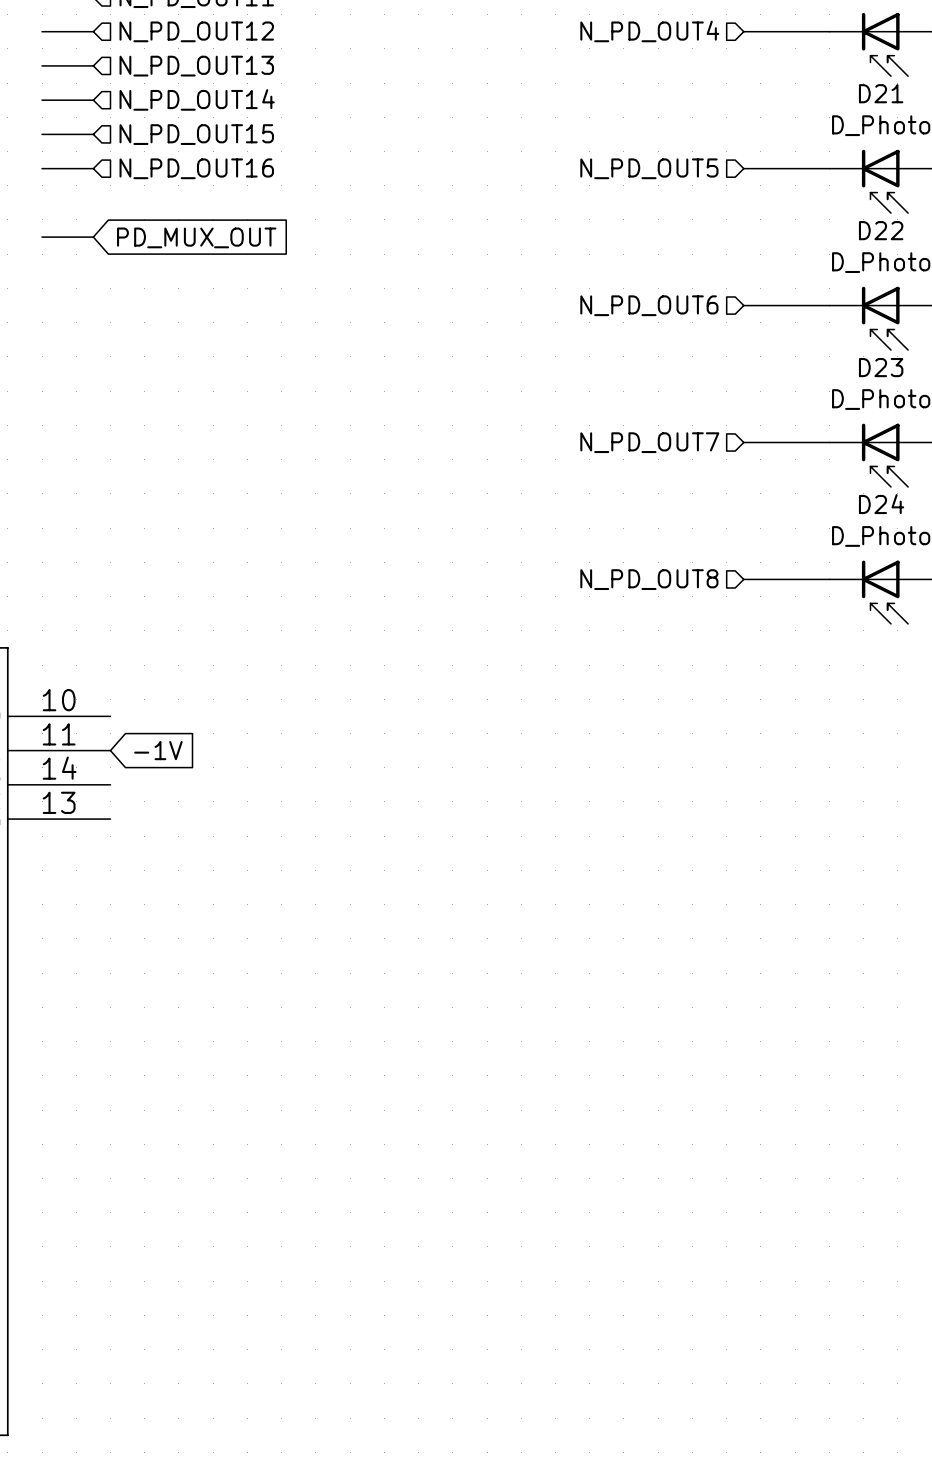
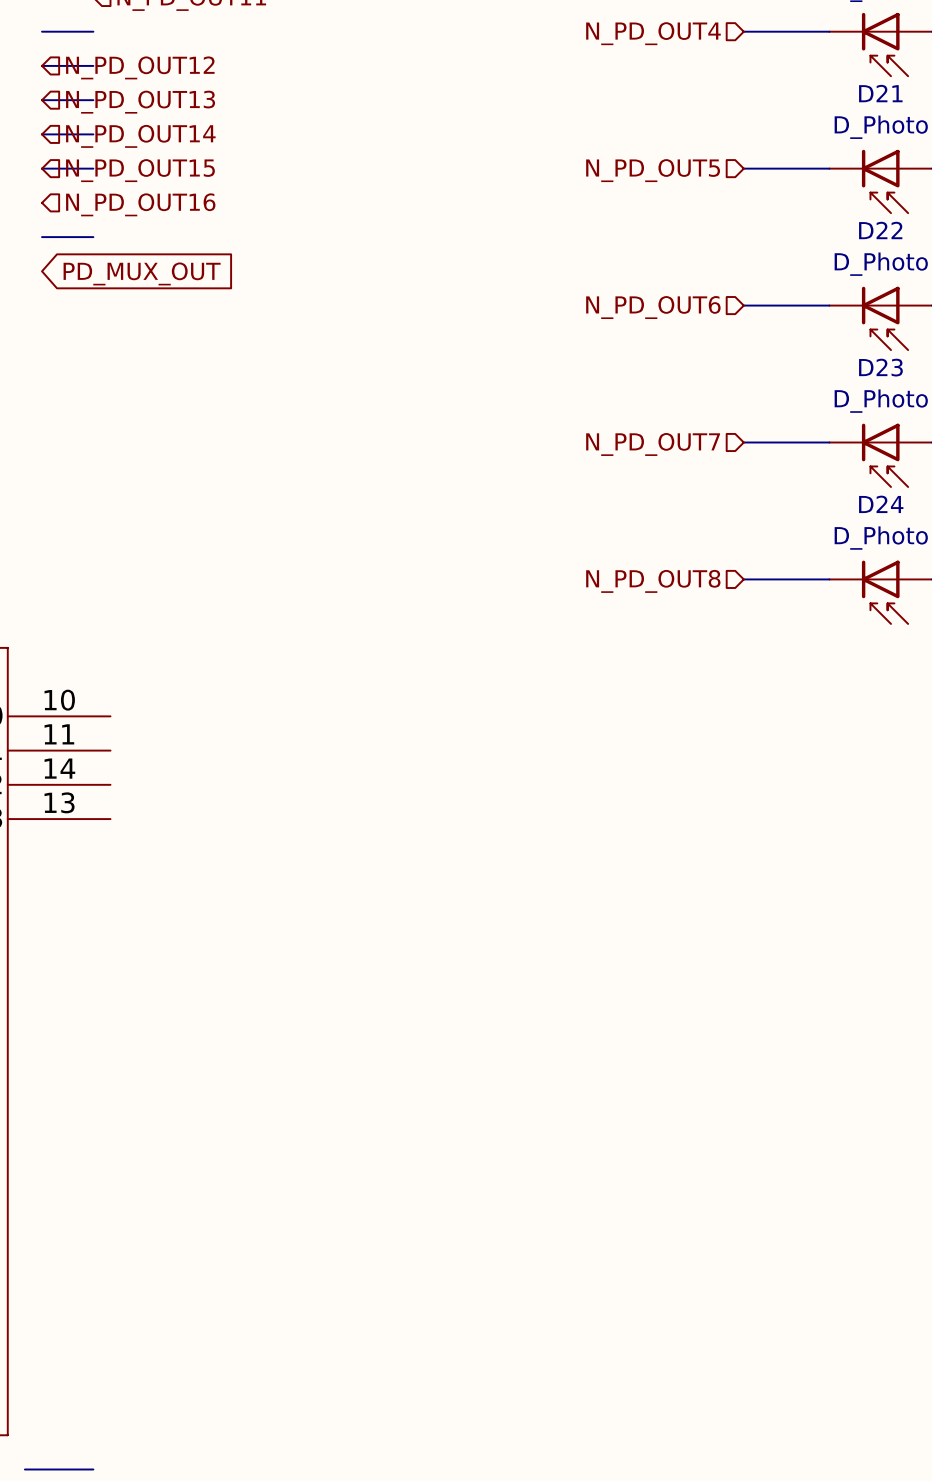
hierarchical label position: N_PD_OUT12 (196, 31) -> N_PD_OUT12 (140, 67)
hierarchical label position: N_PD_OUT13 (196, 66) -> N_PD_OUT13 (140, 102)
hierarchical label position: N_PD_OUT14 (197, 99) -> N_PD_OUT14 (140, 136)
hierarchical label position: N_PD_OUT15 (196, 134) -> N_PD_OUT15 (140, 170)
hierarchical label position: N_PD_OUT16 (196, 168) -> N_PD_OUT16 (140, 204)
global label position: PD_MUX_OUT (196, 237) -> PD_MUX_OUT (142, 273)
global label: -1V (158, 750) -> none
wire: none -> (24, 1469) (93, 1469)

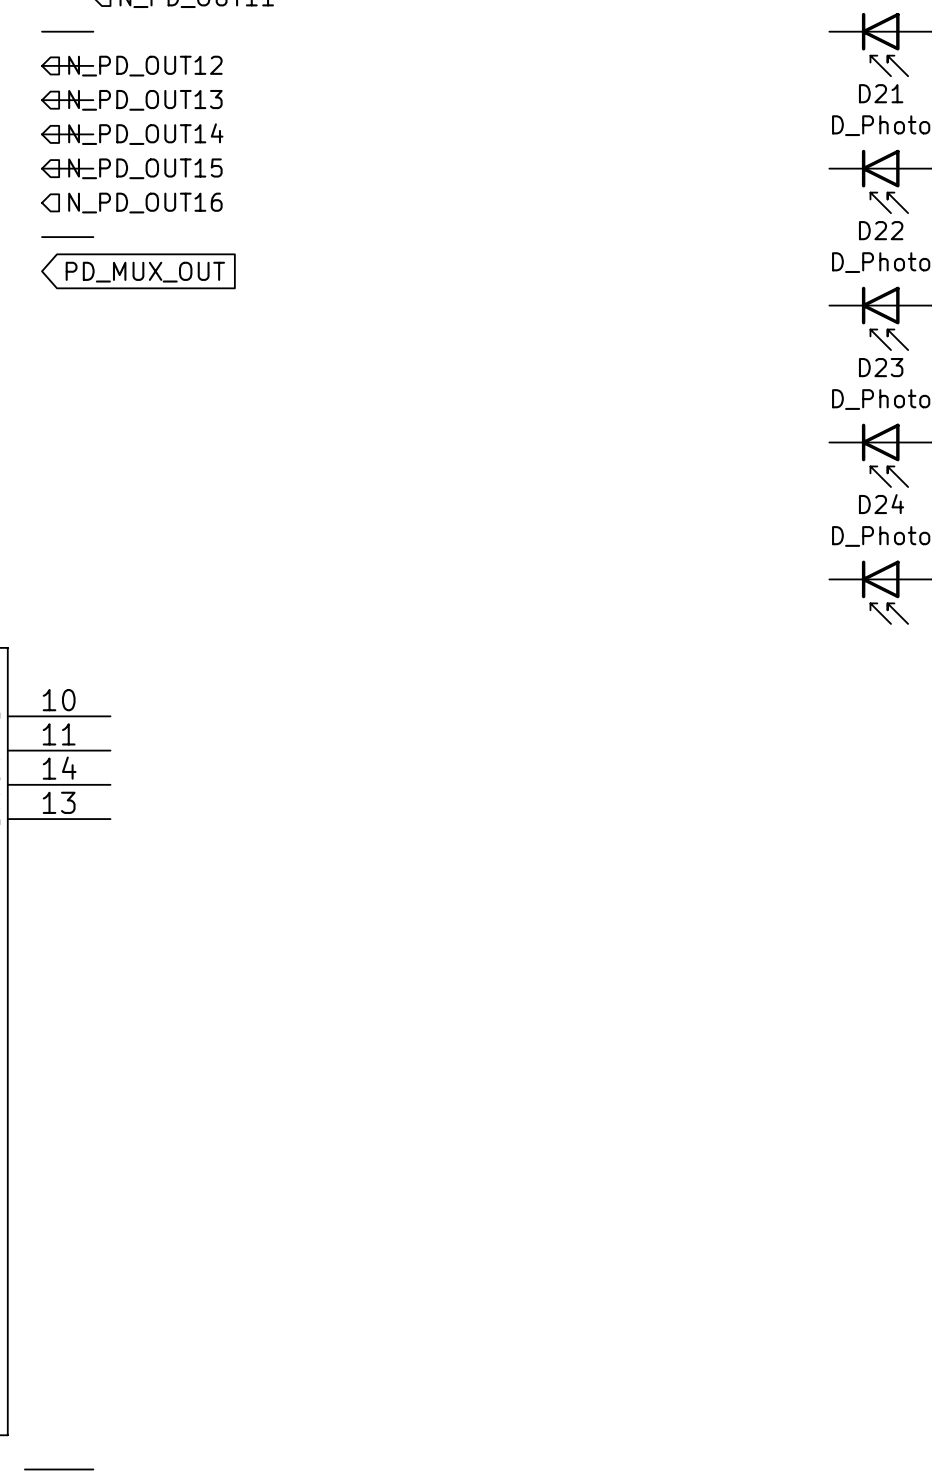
wire: (743, 31) (829, 31) -> none
hierarchical label: N_PD_OUT4 (653, 33) -> none
wire: (743, 168) (829, 168) -> none
hierarchical label: N_PD_OUT5 (653, 170) -> none
wire: (743, 305) (829, 305) -> none
hierarchical label: N_PD_OUT6 (653, 307) -> none
wire: (743, 442) (829, 442) -> none
hierarchical label: N_PD_OUT7 (653, 444) -> none
wire: (743, 579) (829, 579) -> none
hierarchical label: N_PD_OUT8 (653, 581) -> none

